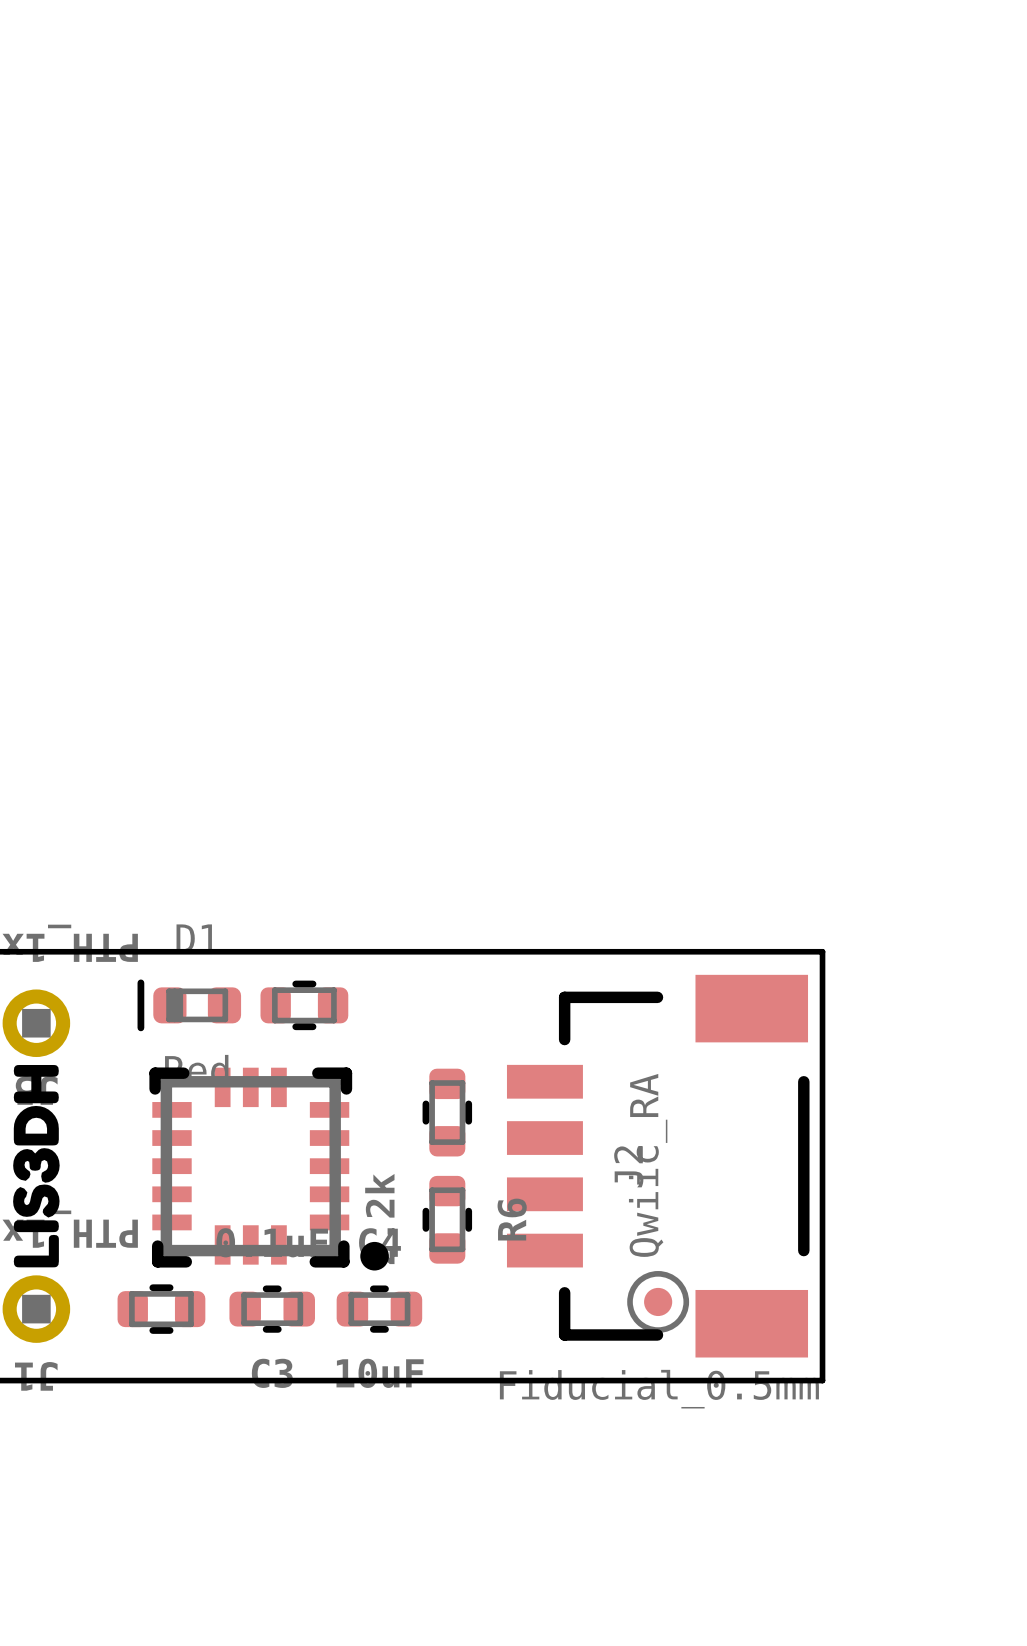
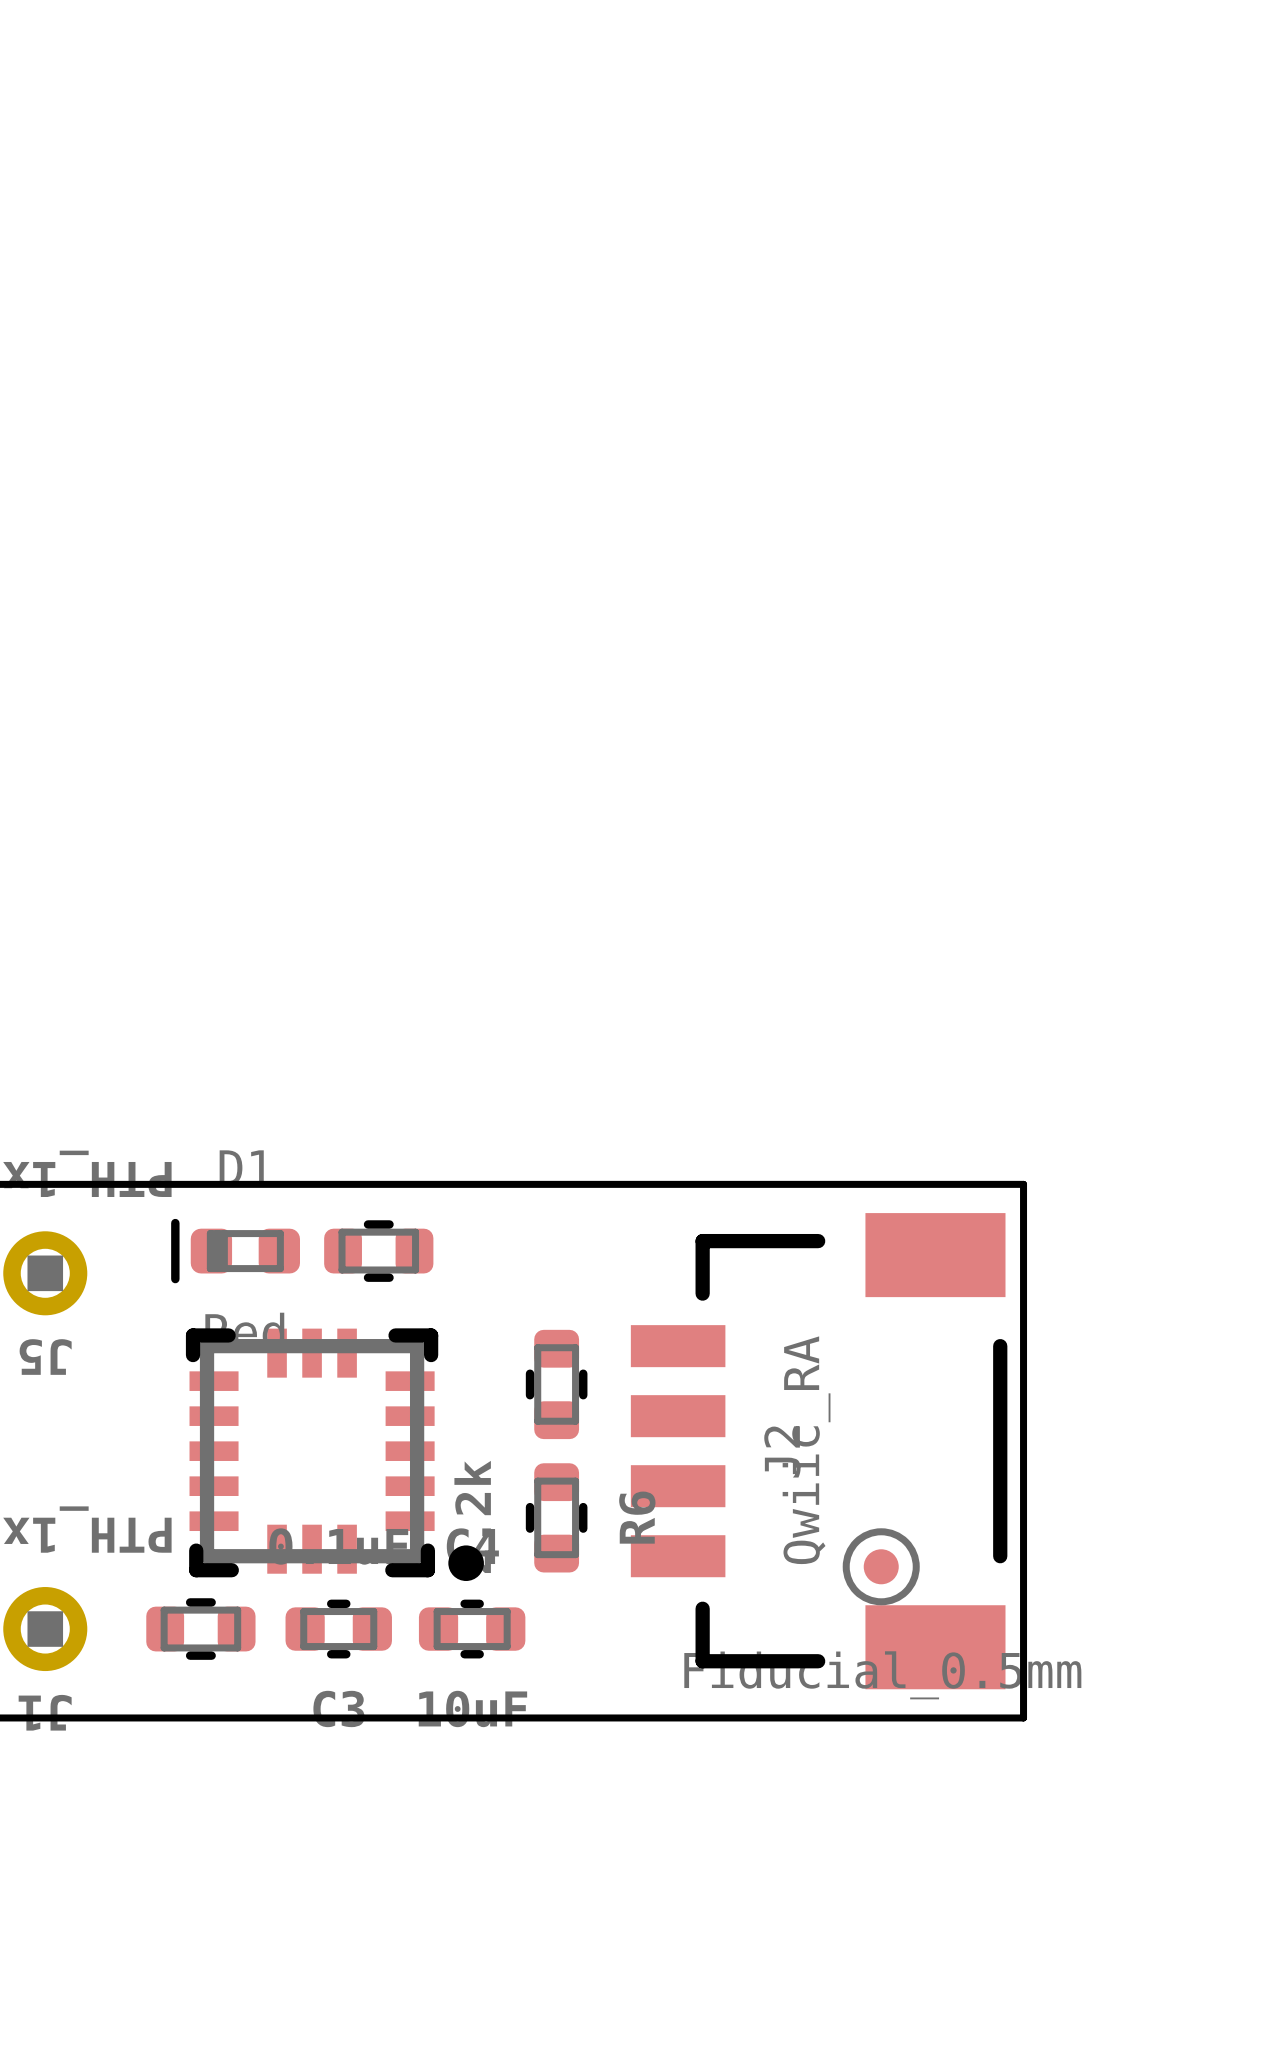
drawing: [13, 1064, 60, 1268] -> none
part position: (658, 1301) -> (881, 1566)

